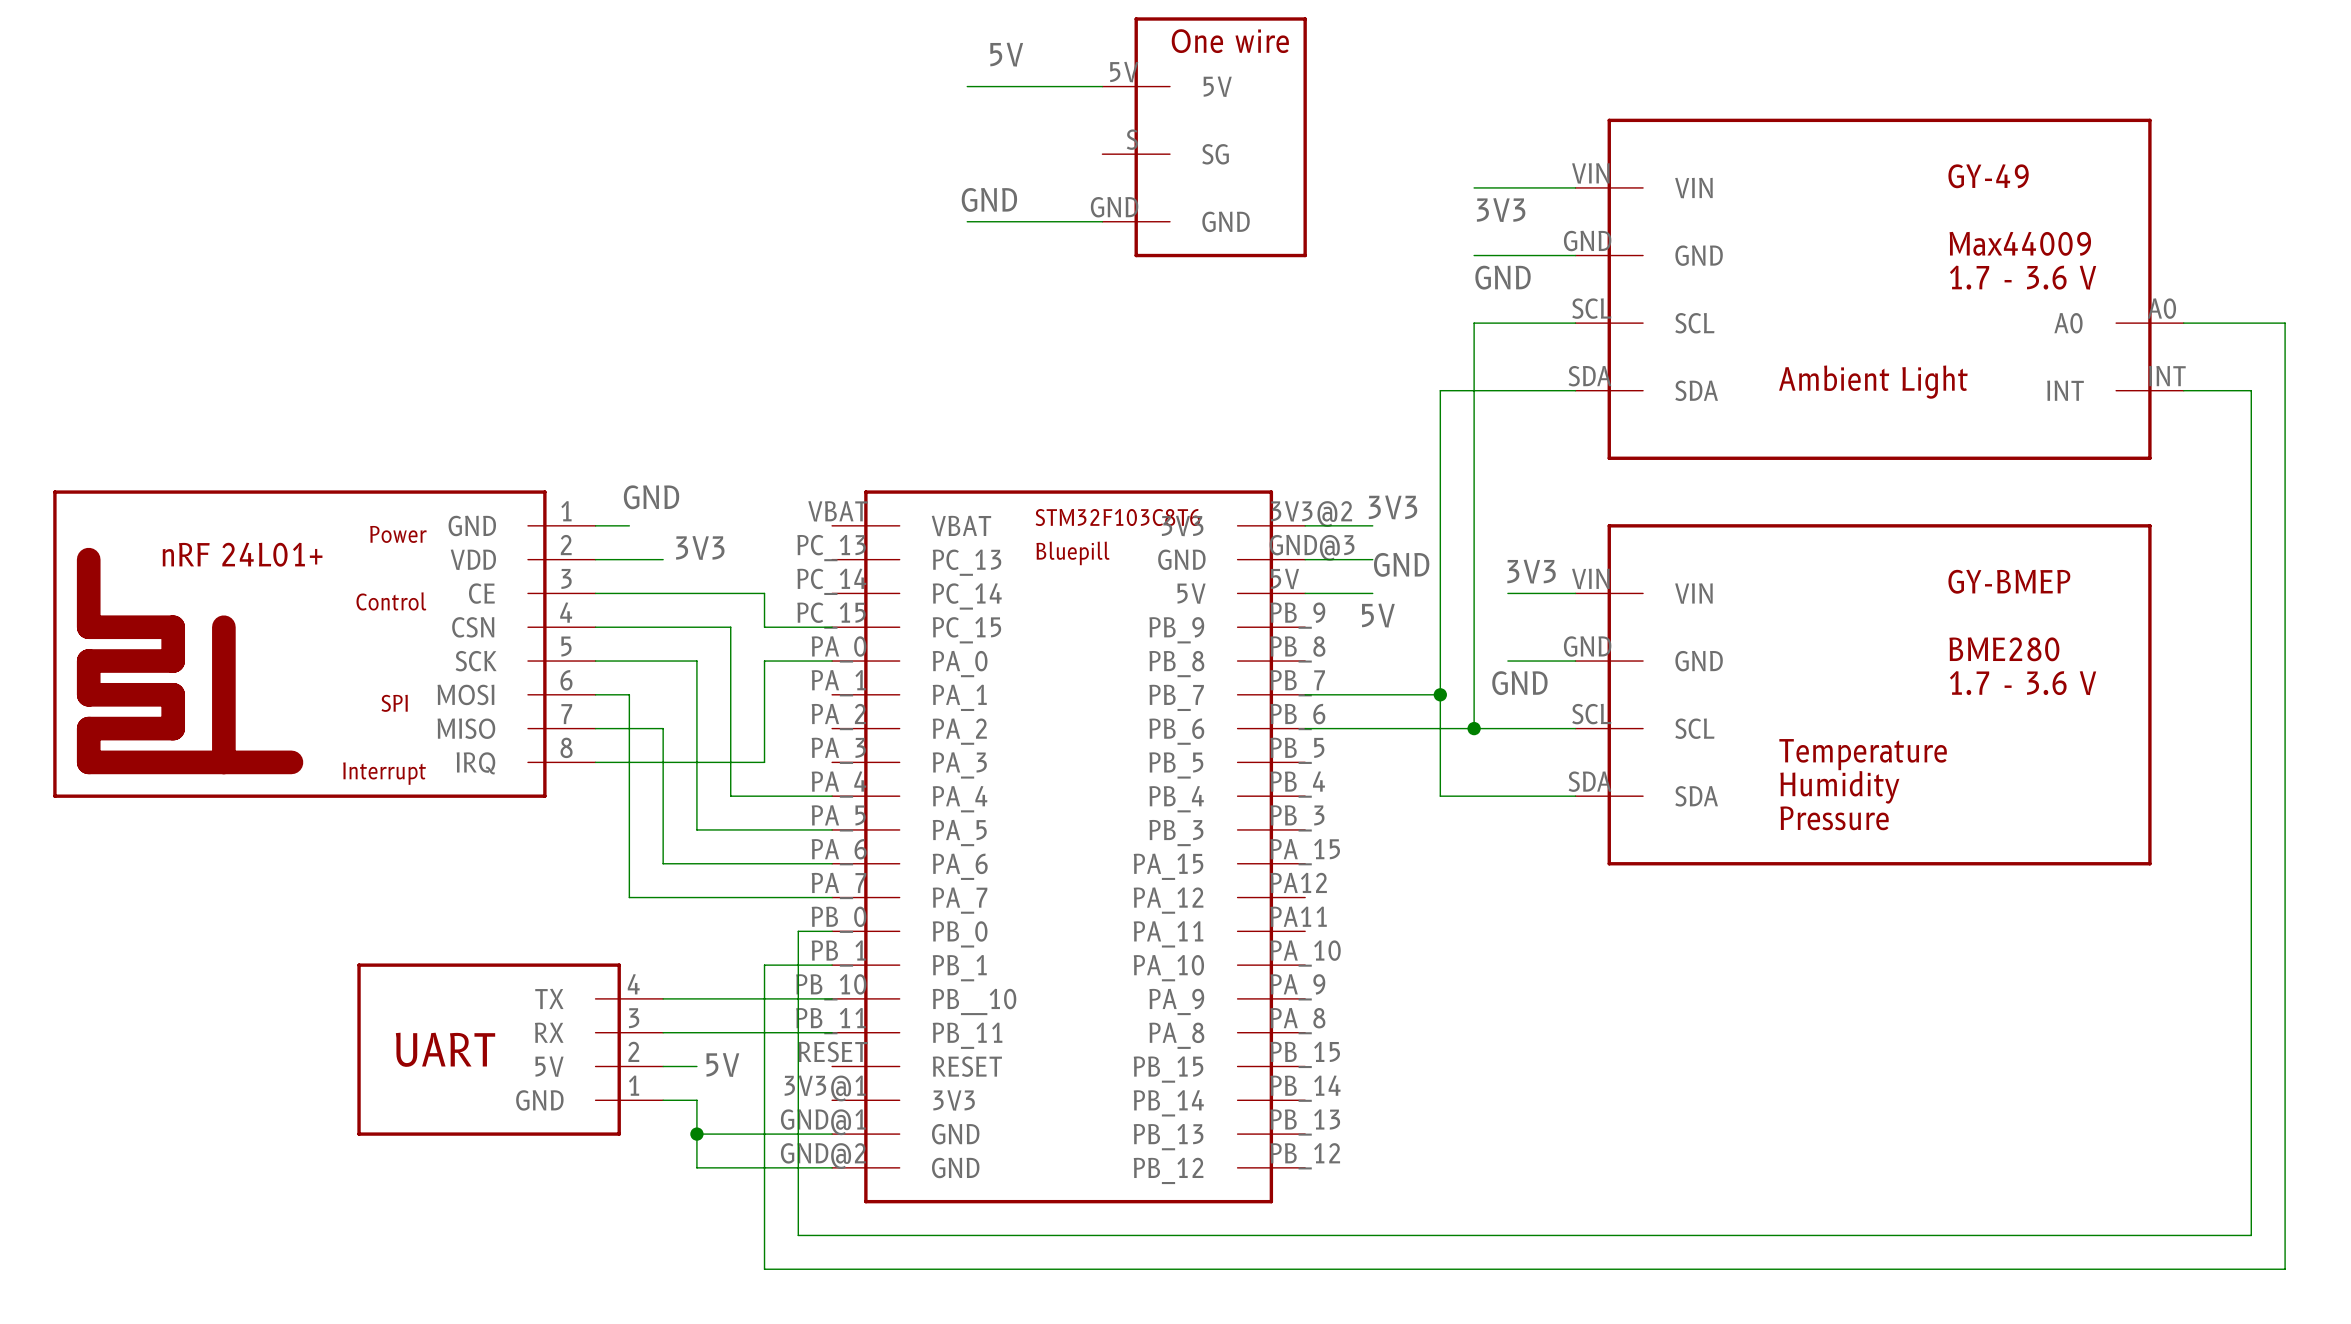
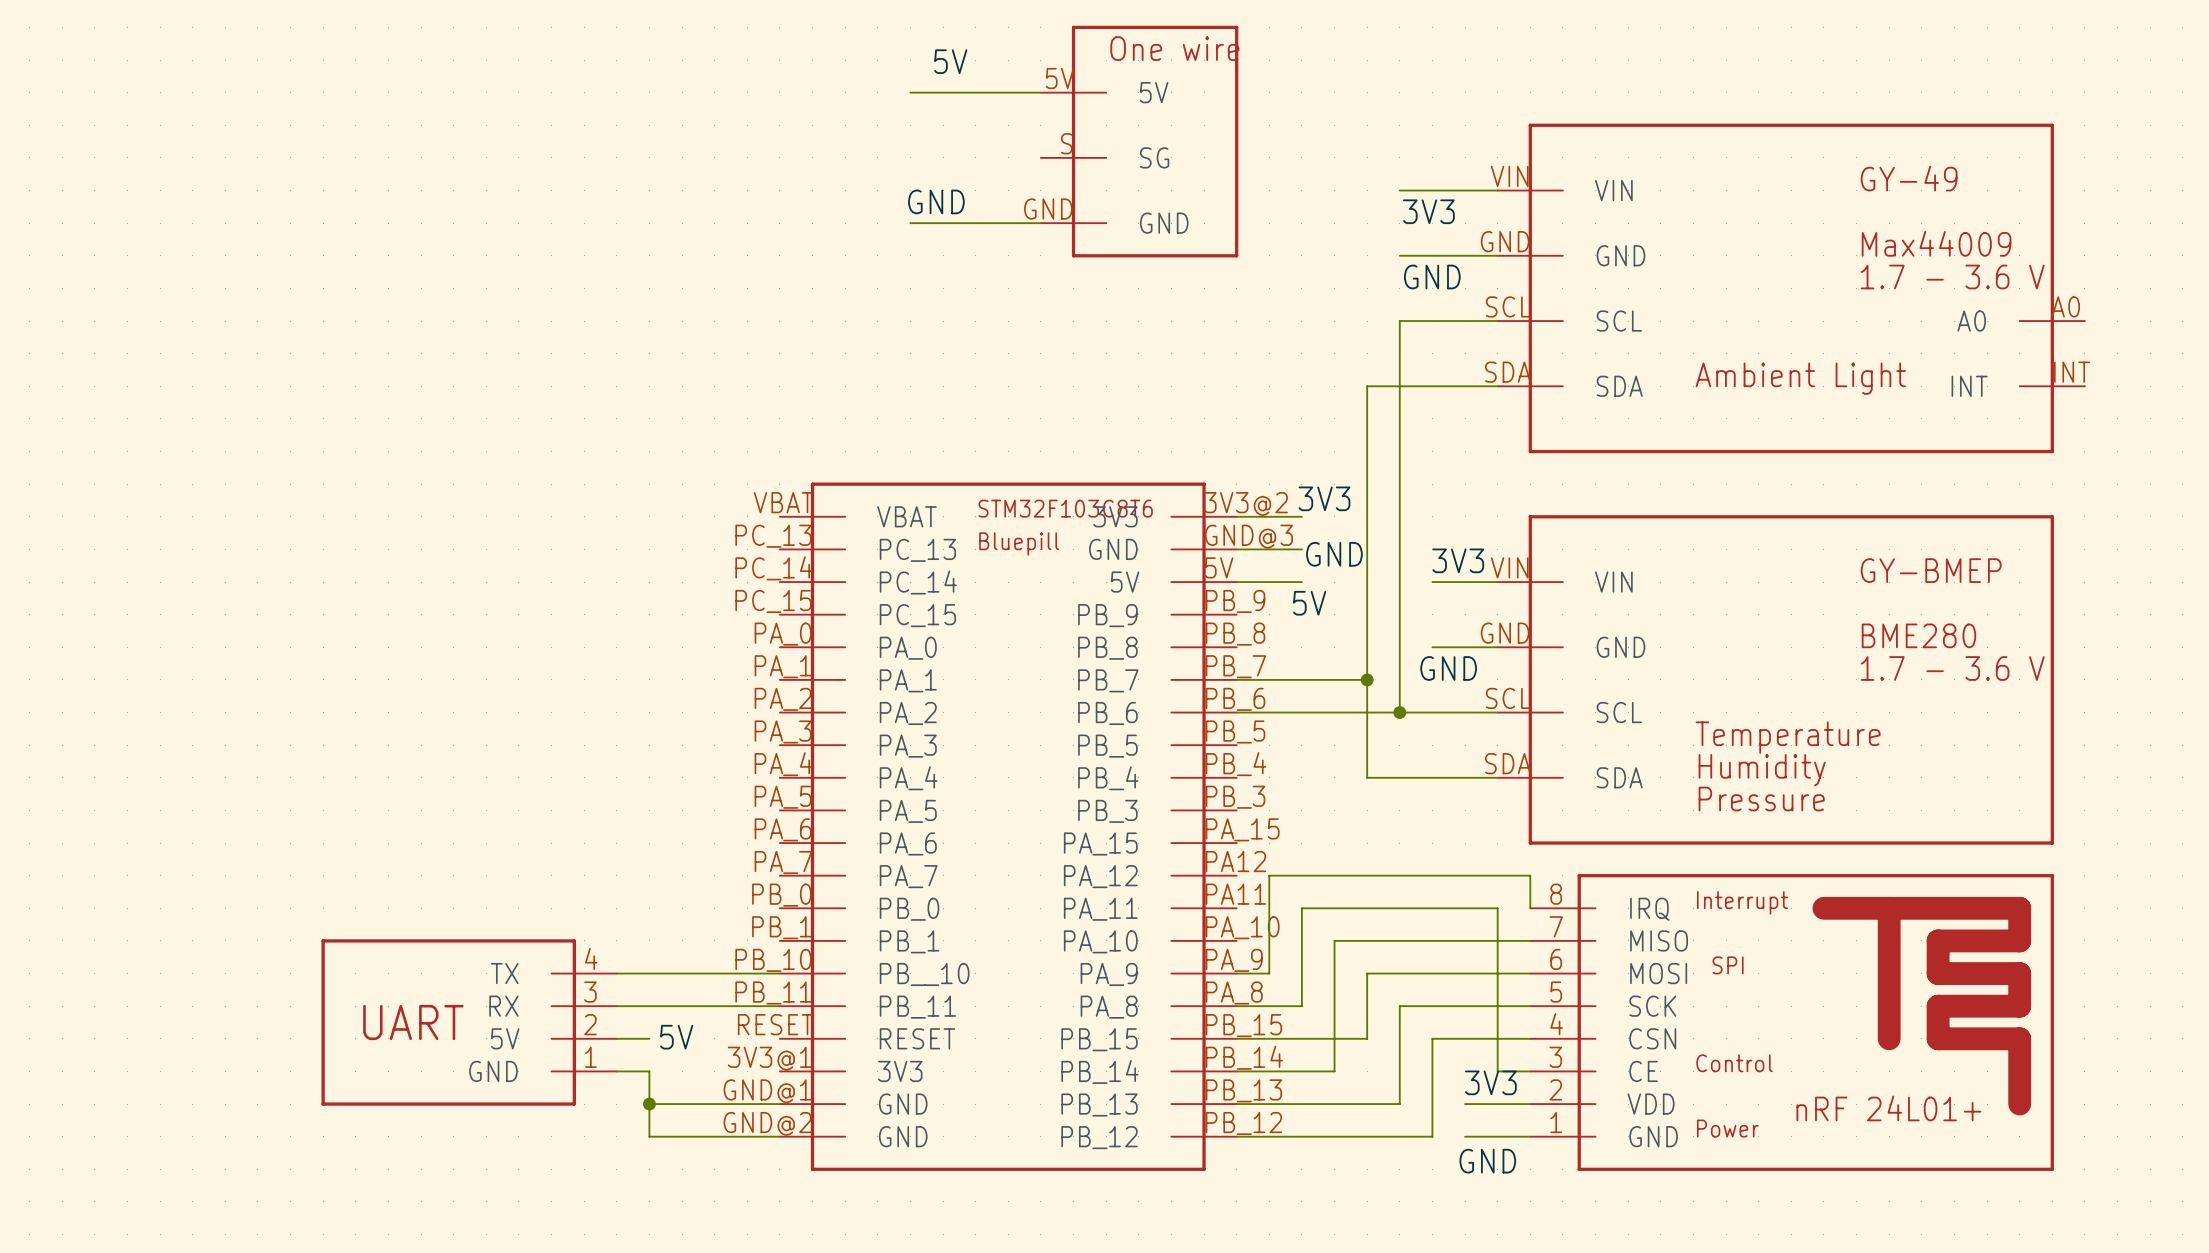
wire: (2183, 323) (2285, 323) (2285, 1269) (764, 1269) (764, 965) (832, 965) -> none
wire: (2183, 390) (2251, 390) (2251, 1235) (798, 1235) (798, 931) (832, 931) -> none
label: GND (651, 497) -> none
wire: (595, 525) (629, 525) -> none
label: 3V3 (700, 547) -> none
wire: (595, 559) (663, 559) -> none
wire: (595, 593) (764, 593) (764, 627) (832, 627) -> none
wire: (595, 627) (730, 627) (730, 796) (832, 796) -> none
part: (324, 644) -> none
wire: (595, 661) (696, 661) (696, 829) (832, 829) -> none
wire: (832, 661) (764, 661) (764, 762) (595, 762) -> none
wire: (595, 694) (629, 694) (629, 897) (832, 897) -> none
wire: (595, 728) (663, 728) (663, 863) (832, 863) -> none
wire: none -> (1530, 908) (1530, 875) (1269, 875) (1269, 973) (1236, 973)
wire: none -> (1530, 940) (1334, 940) (1334, 1071) (1236, 1071)
wire: none -> (1530, 973) (1367, 973) (1367, 1038) (1236, 1038)
wire: none -> (1236, 1006) (1301, 1006) (1301, 908) (1497, 908) (1497, 1071) (1530, 1071)
wire: none -> (1530, 1006) (1399, 1006) (1399, 1104) (1236, 1104)
part: none -> (1792, 1022)
wire: none -> (1530, 1038) (1432, 1038) (1432, 1136) (1236, 1136)
label: none -> 3V3 (1490, 1082)
wire: none -> (1465, 1104) (1530, 1104)
wire: none -> (1465, 1136) (1530, 1136)
label: none -> GND (1487, 1161)

